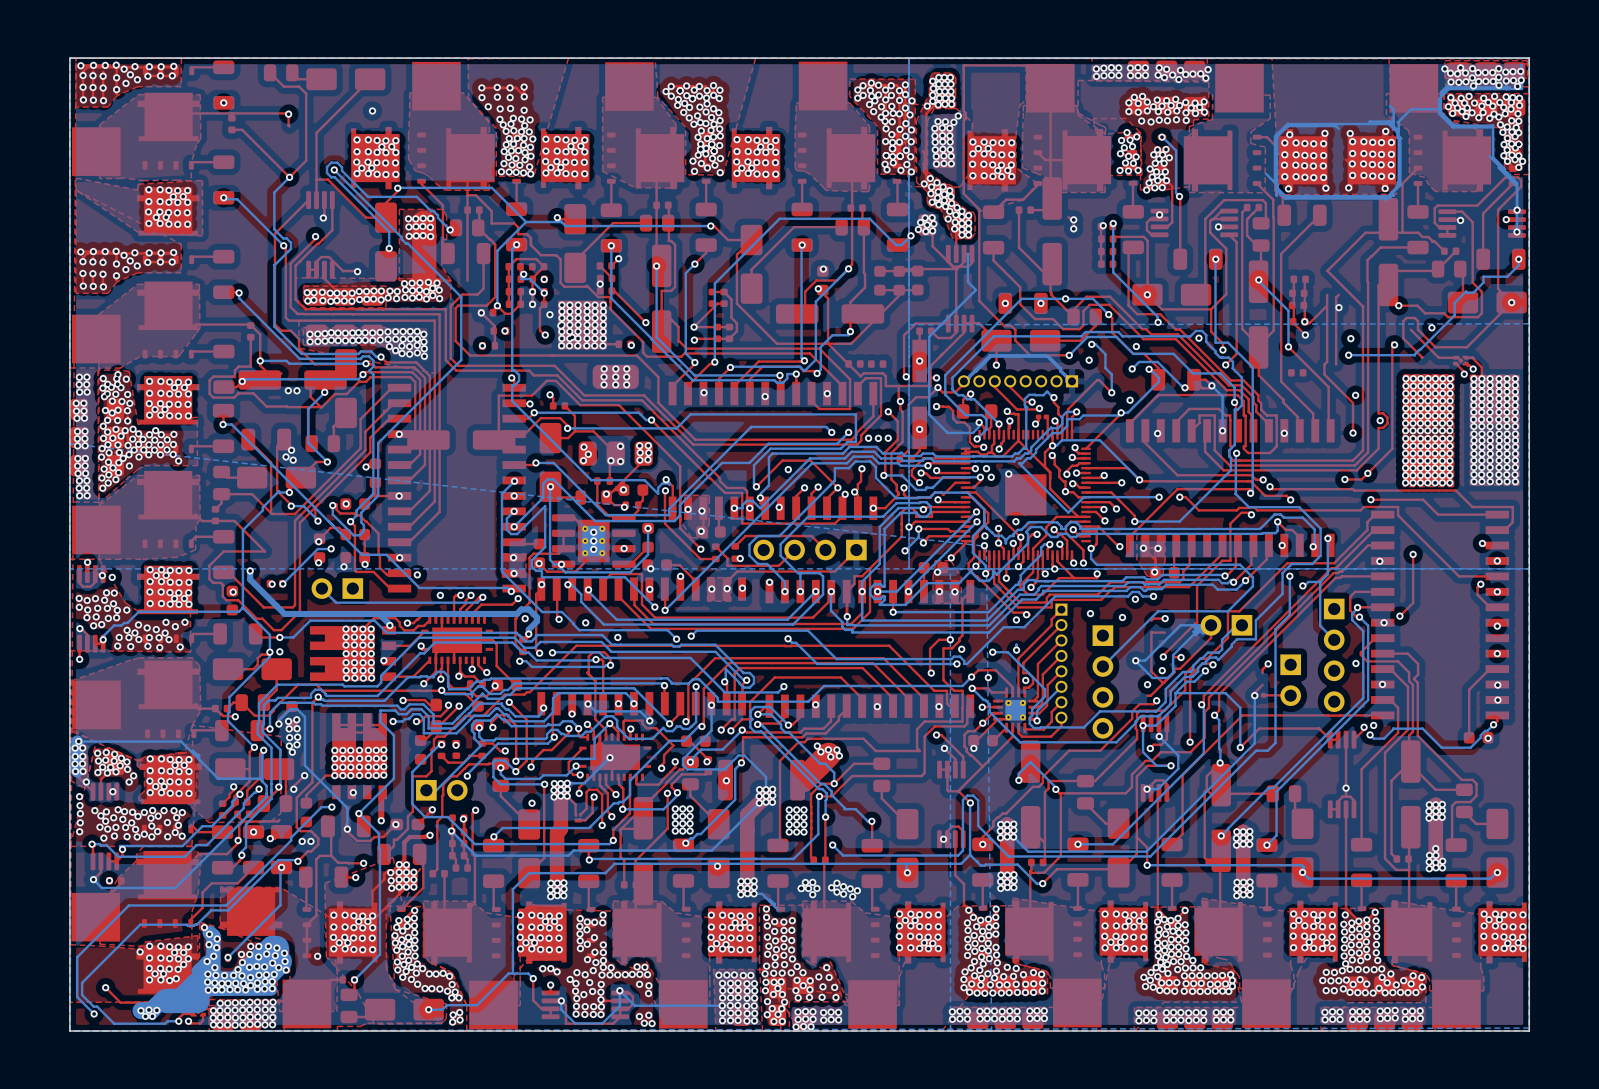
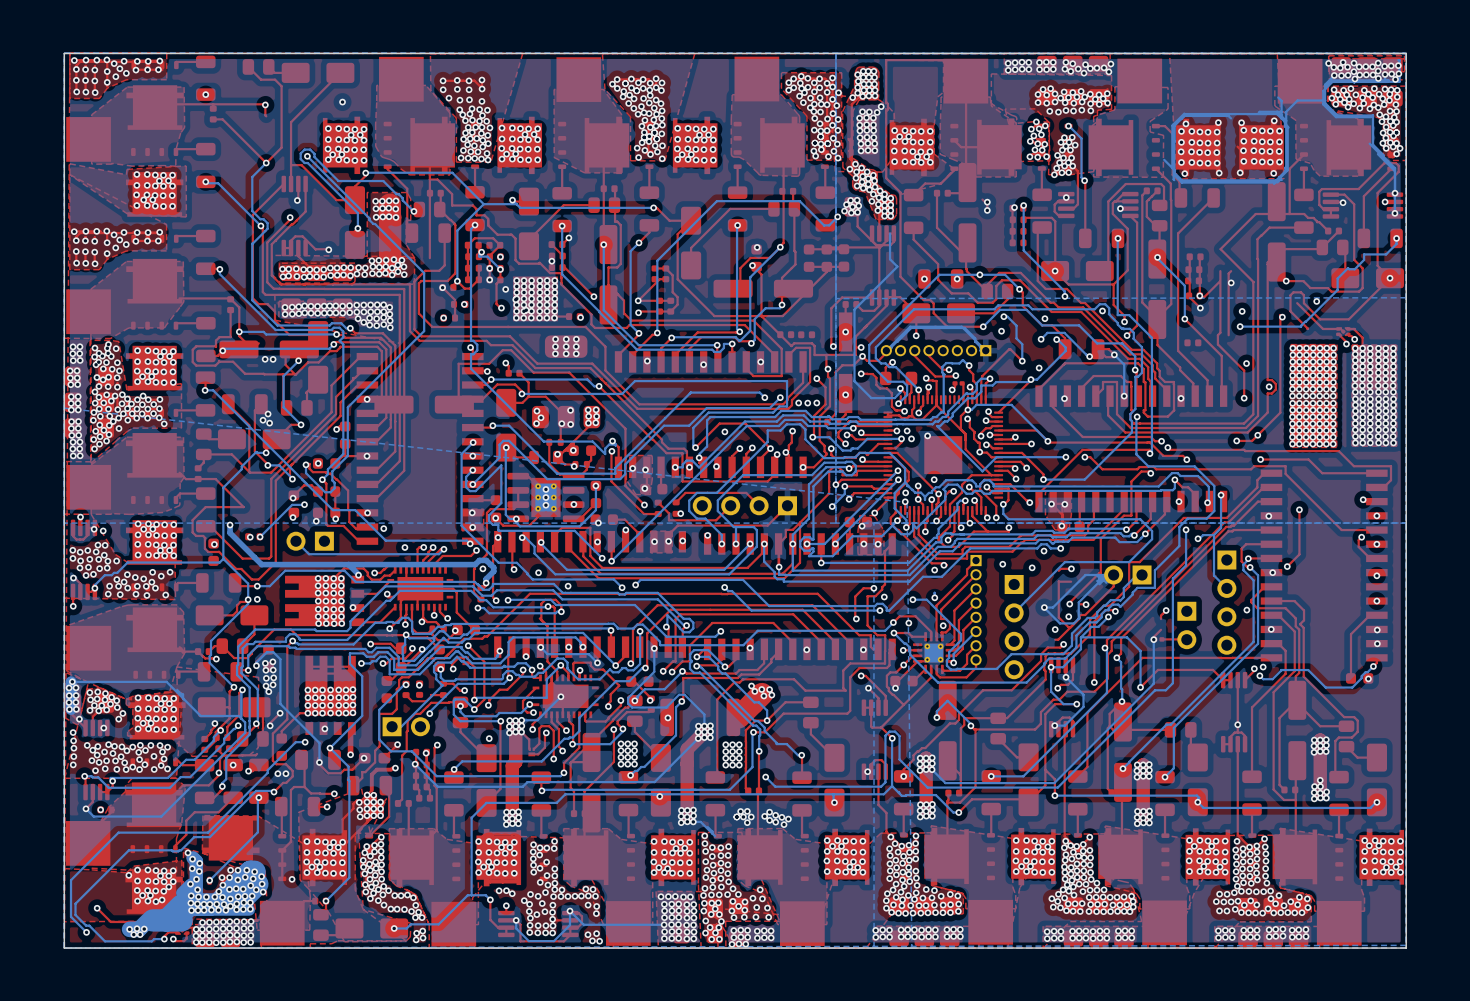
bottom track: none -> (405, 635) (405, 644) (402, 646) (403, 660) (414, 660) (434, 640)

